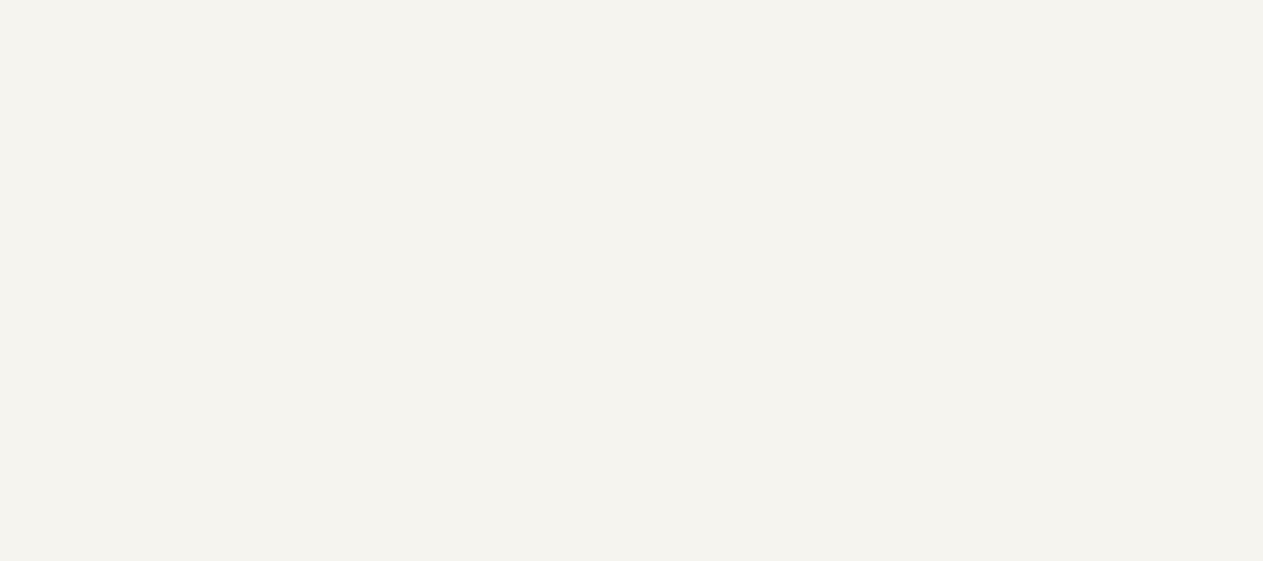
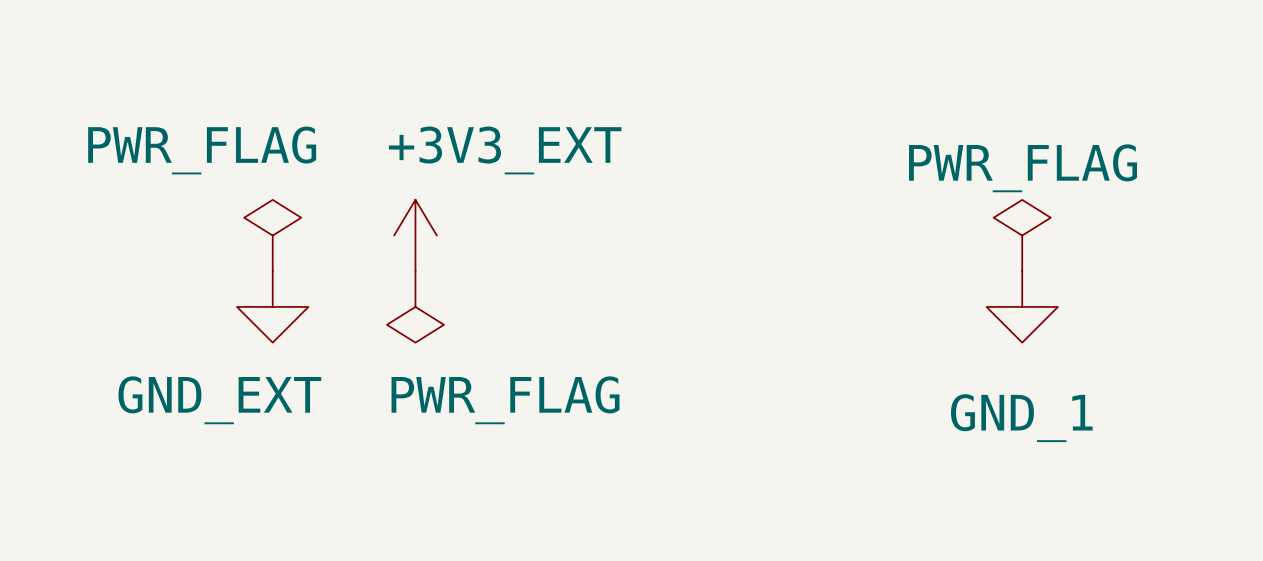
power symbol: none -> PWR_FLAG (272, 235)
power symbol: none -> +3V3_EXT (415, 235)
power symbol: none -> PWR_FLAG (1022, 235)
power symbol: none -> GND_EXT (272, 306)
power symbol: none -> PWR_FLAG (415, 306)
power symbol: none -> GND_1 (1022, 306)

